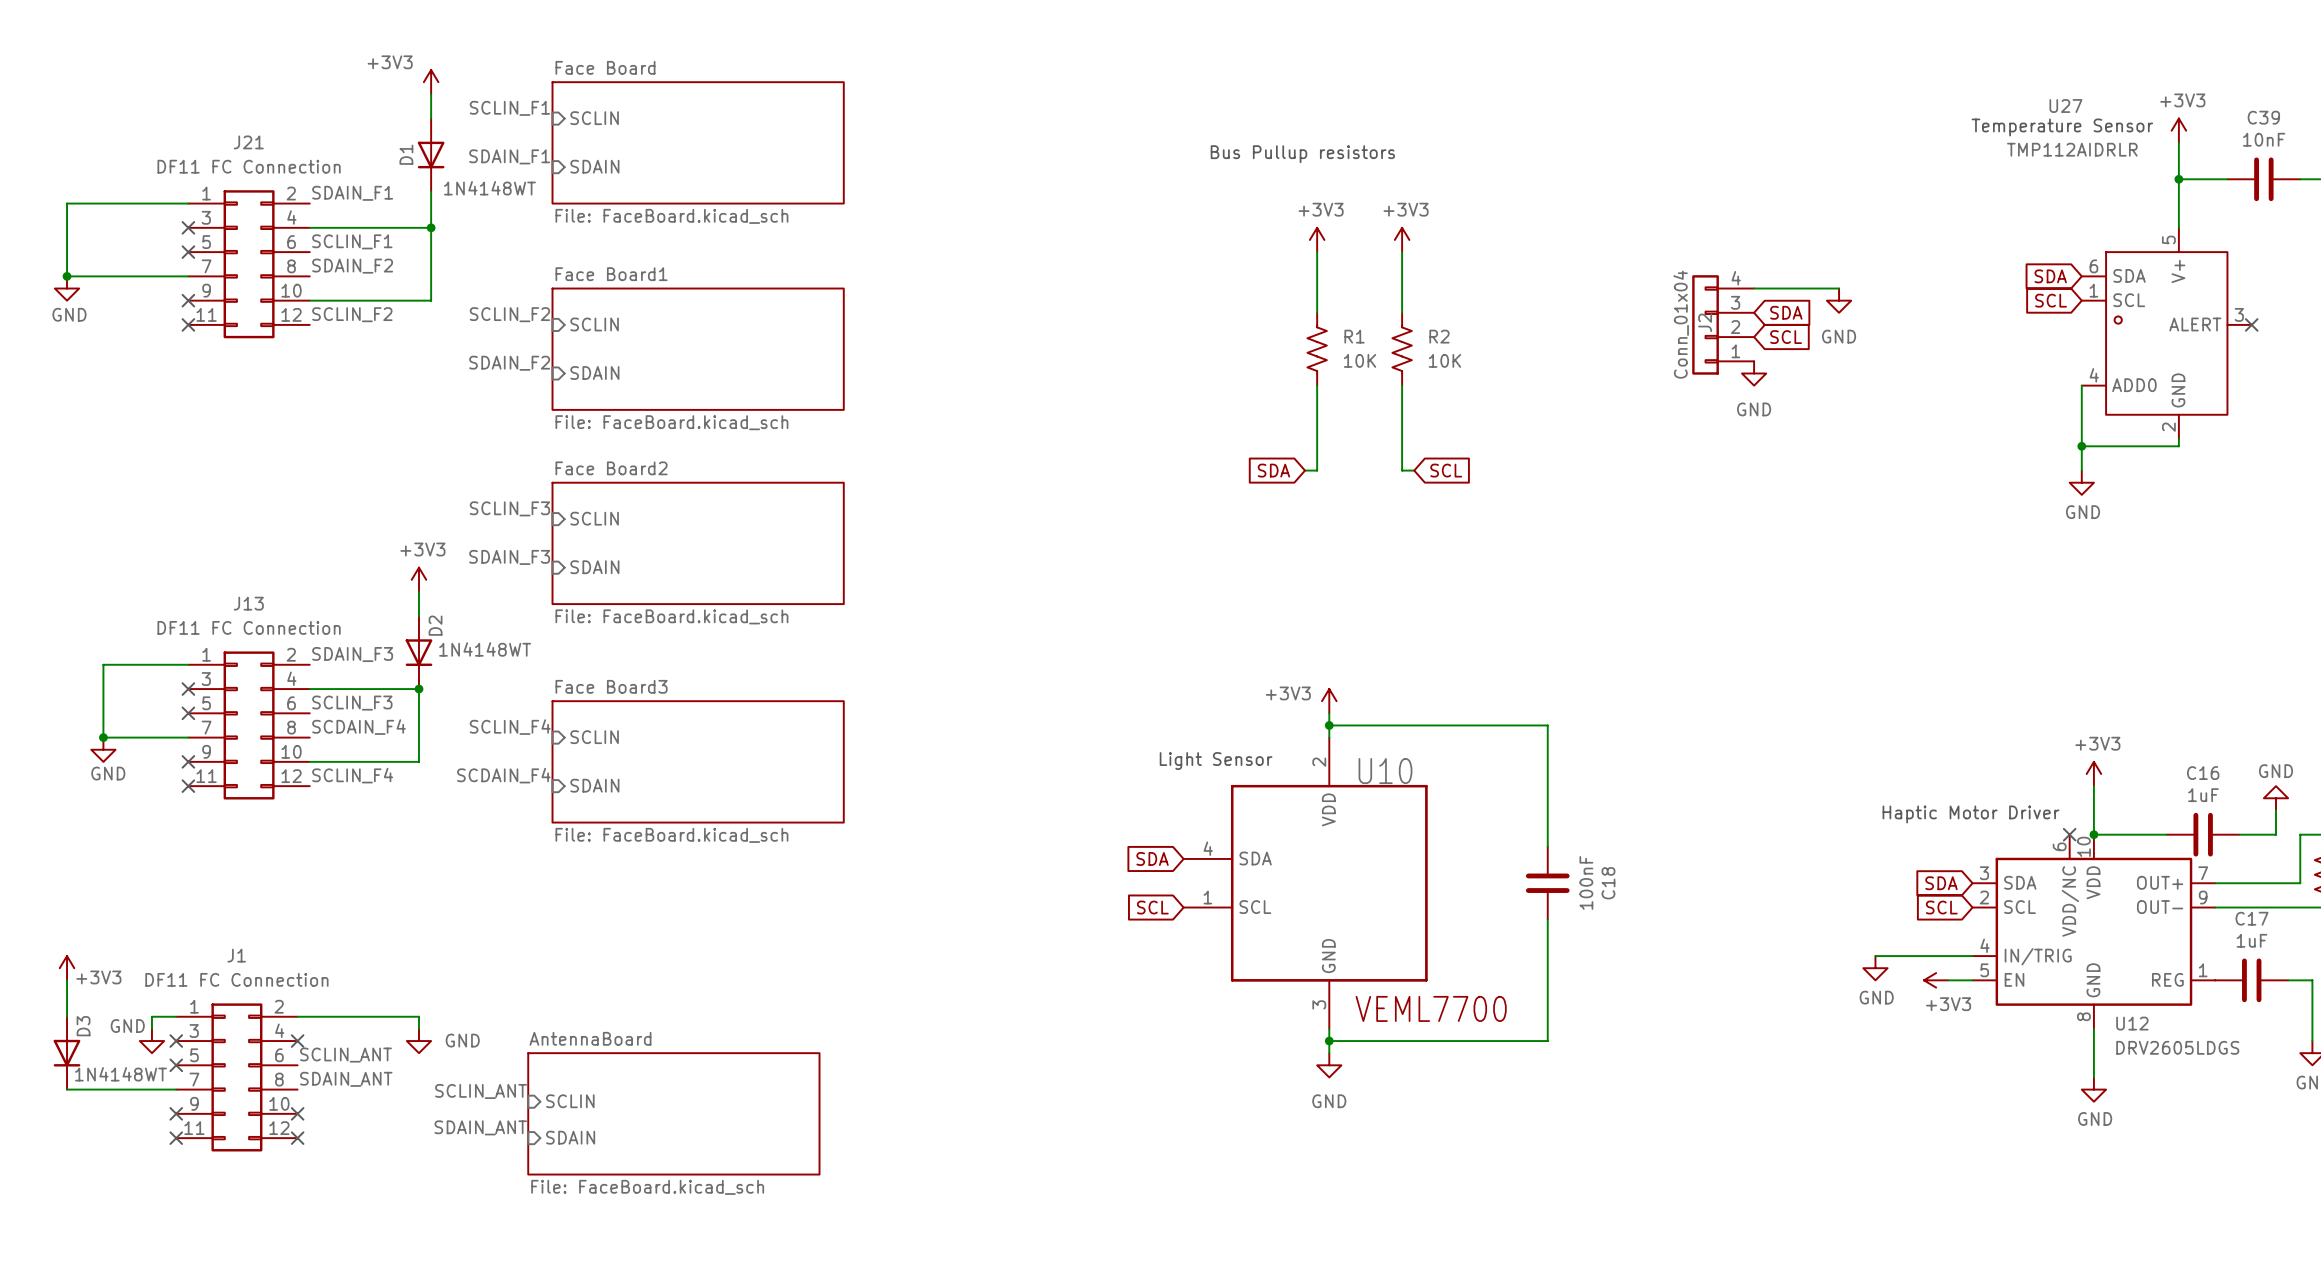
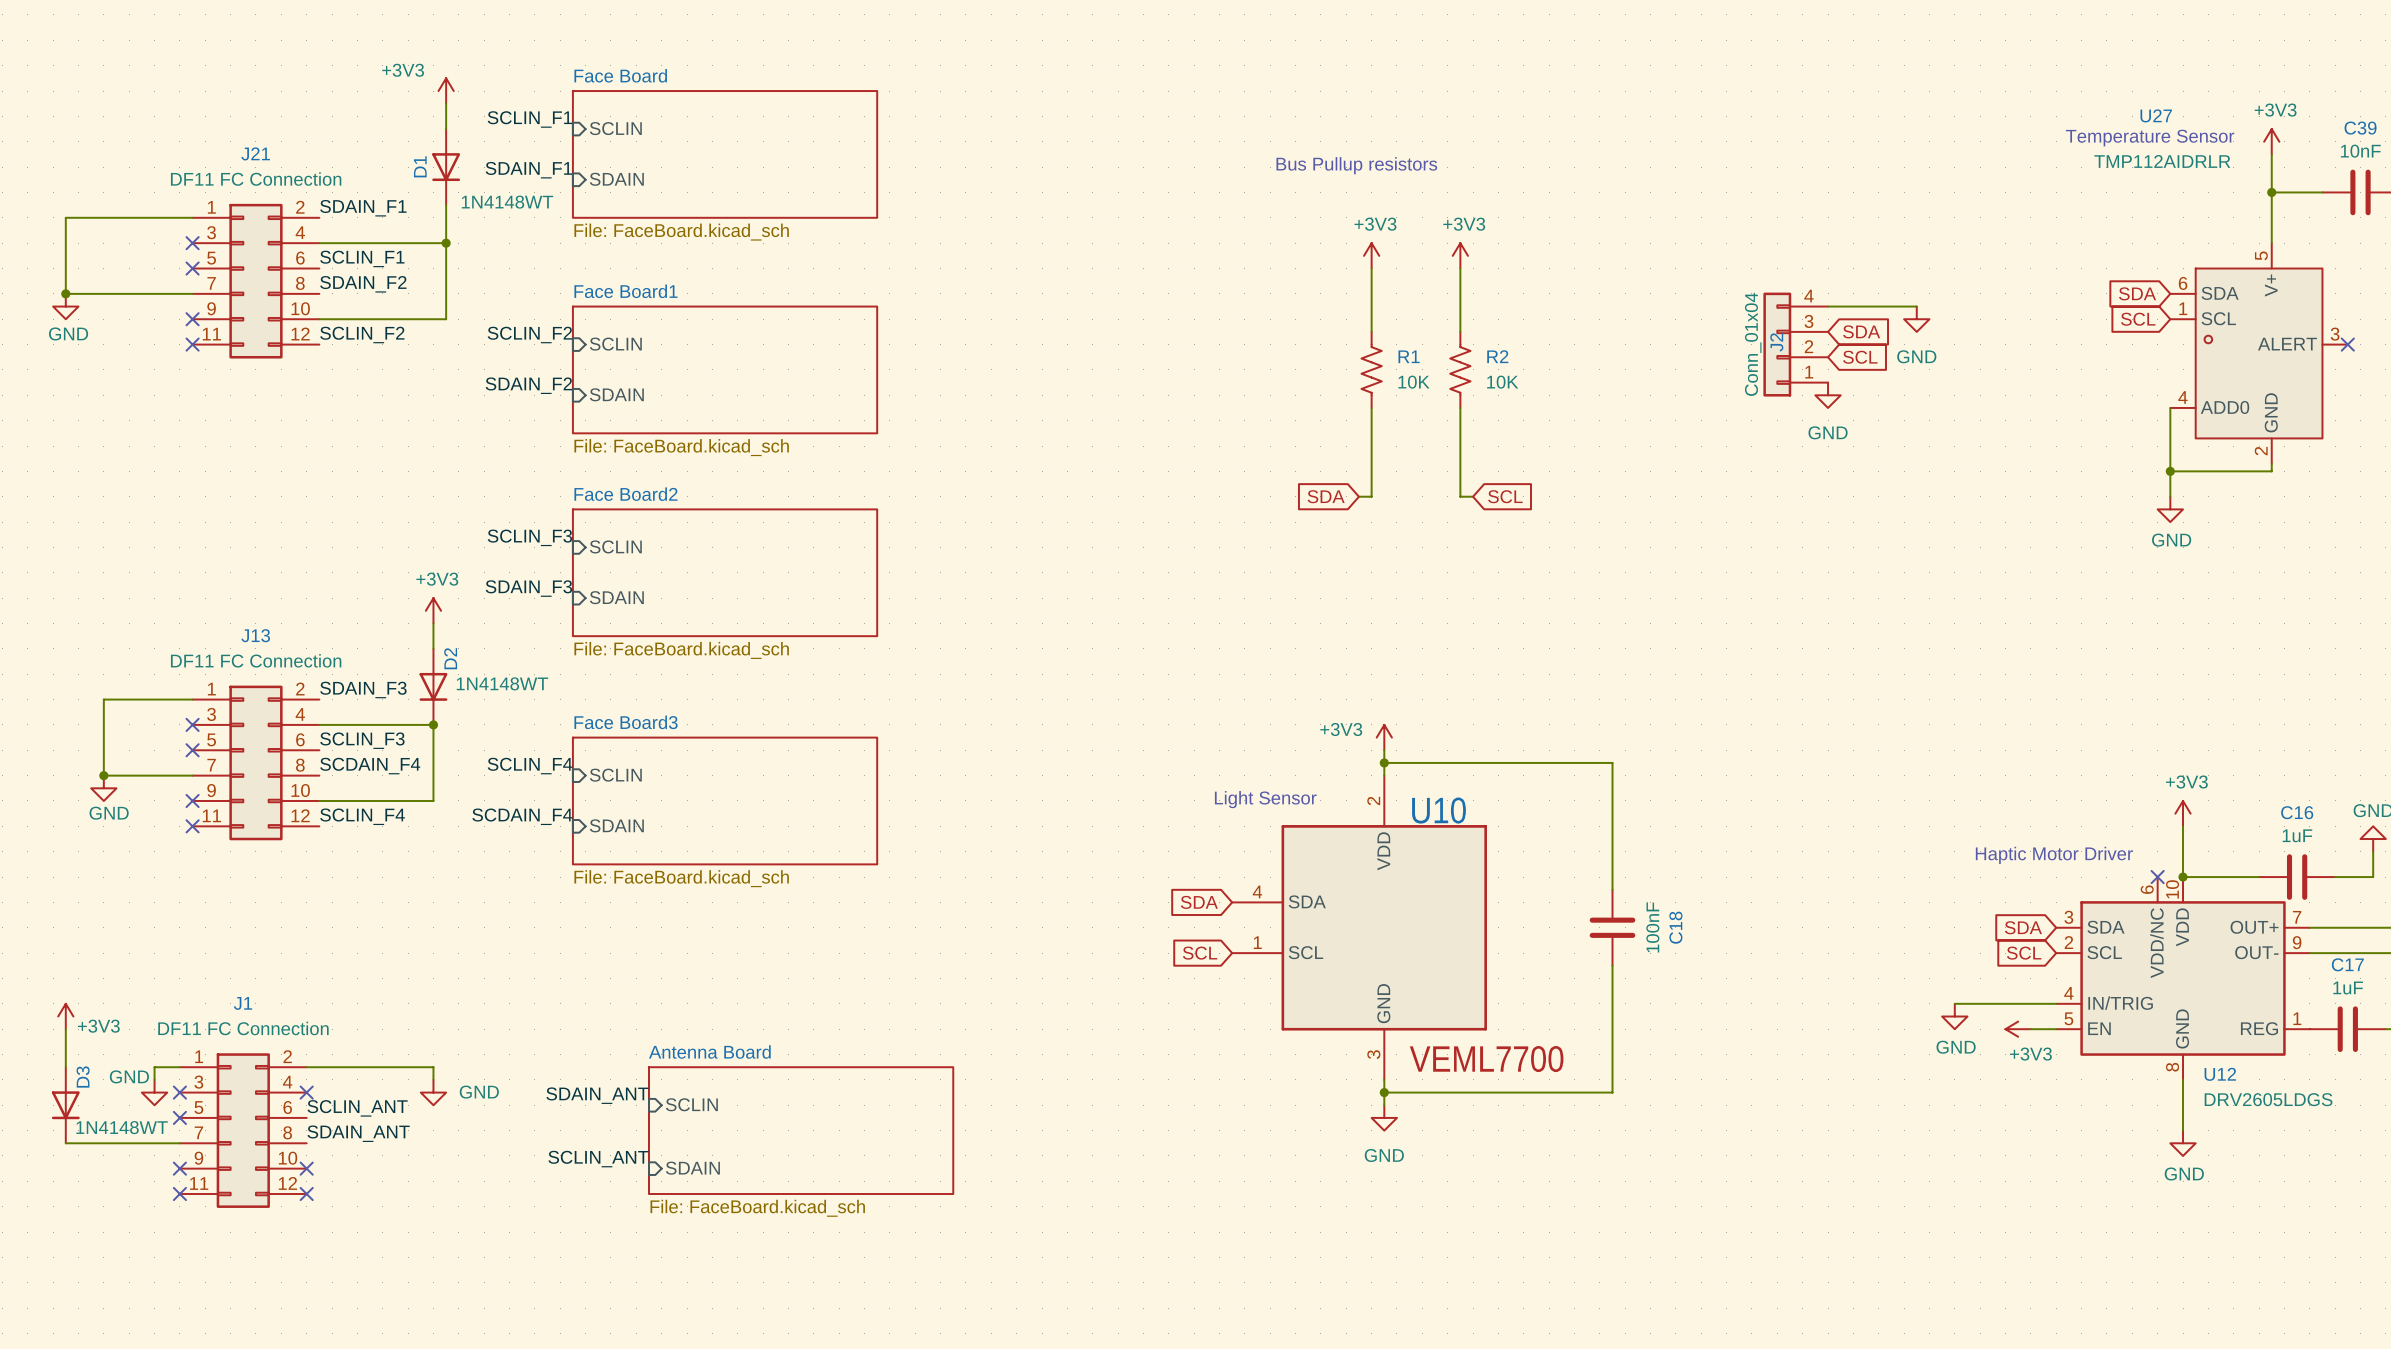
sheet Antenna Board: none -> File: FaceBoard.kicad_sch (801, 1130)
label position: SCLIN_ANT (481, 1091) -> SCLIN_ANT (598, 1159)
sheet pin position: SCLIN (570, 1101) -> SCLIN (691, 1104)
sheet AntennaBoard: File: FaceBoard.kicad_sch (673, 1113) -> none
label position: SDAIN_ANT (480, 1127) -> SDAIN_ANT (597, 1095)
sheet pin position: SDAIN (570, 1137) -> SDAIN (692, 1168)

